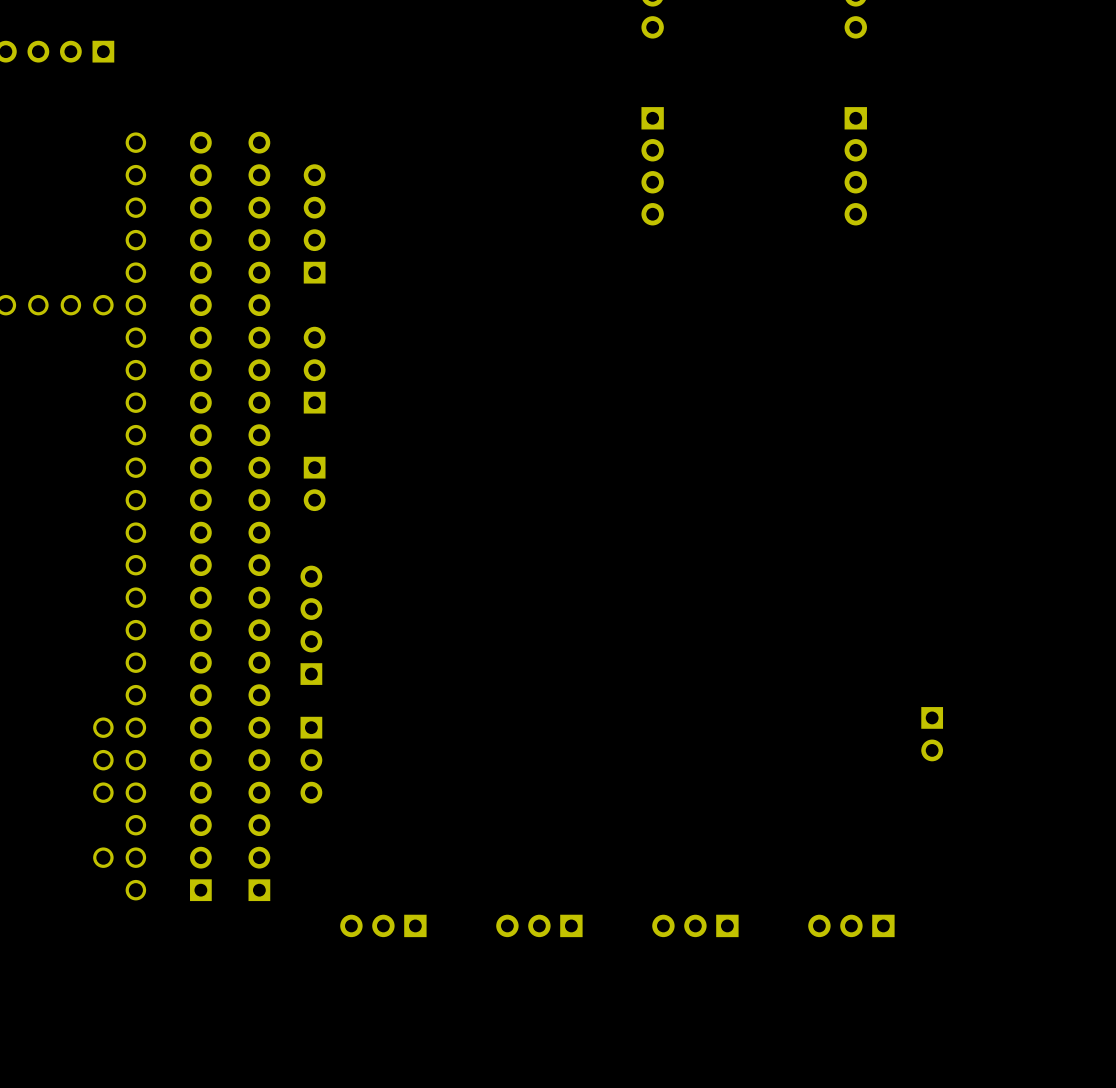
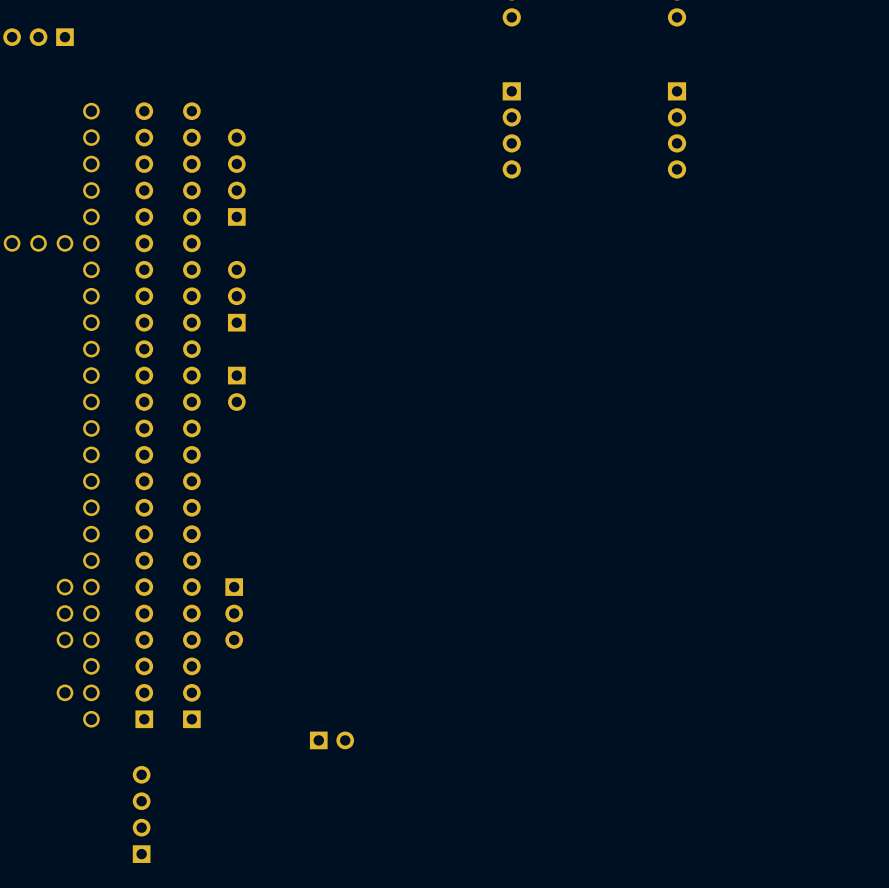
part: (311, 625) -> none
part: (932, 734) -> none
part: none -> (332, 740)
part: (383, 925) -> none
part: (539, 925) -> none
part: (695, 925) -> none
part: (851, 925) -> none
part: none -> (141, 814)

